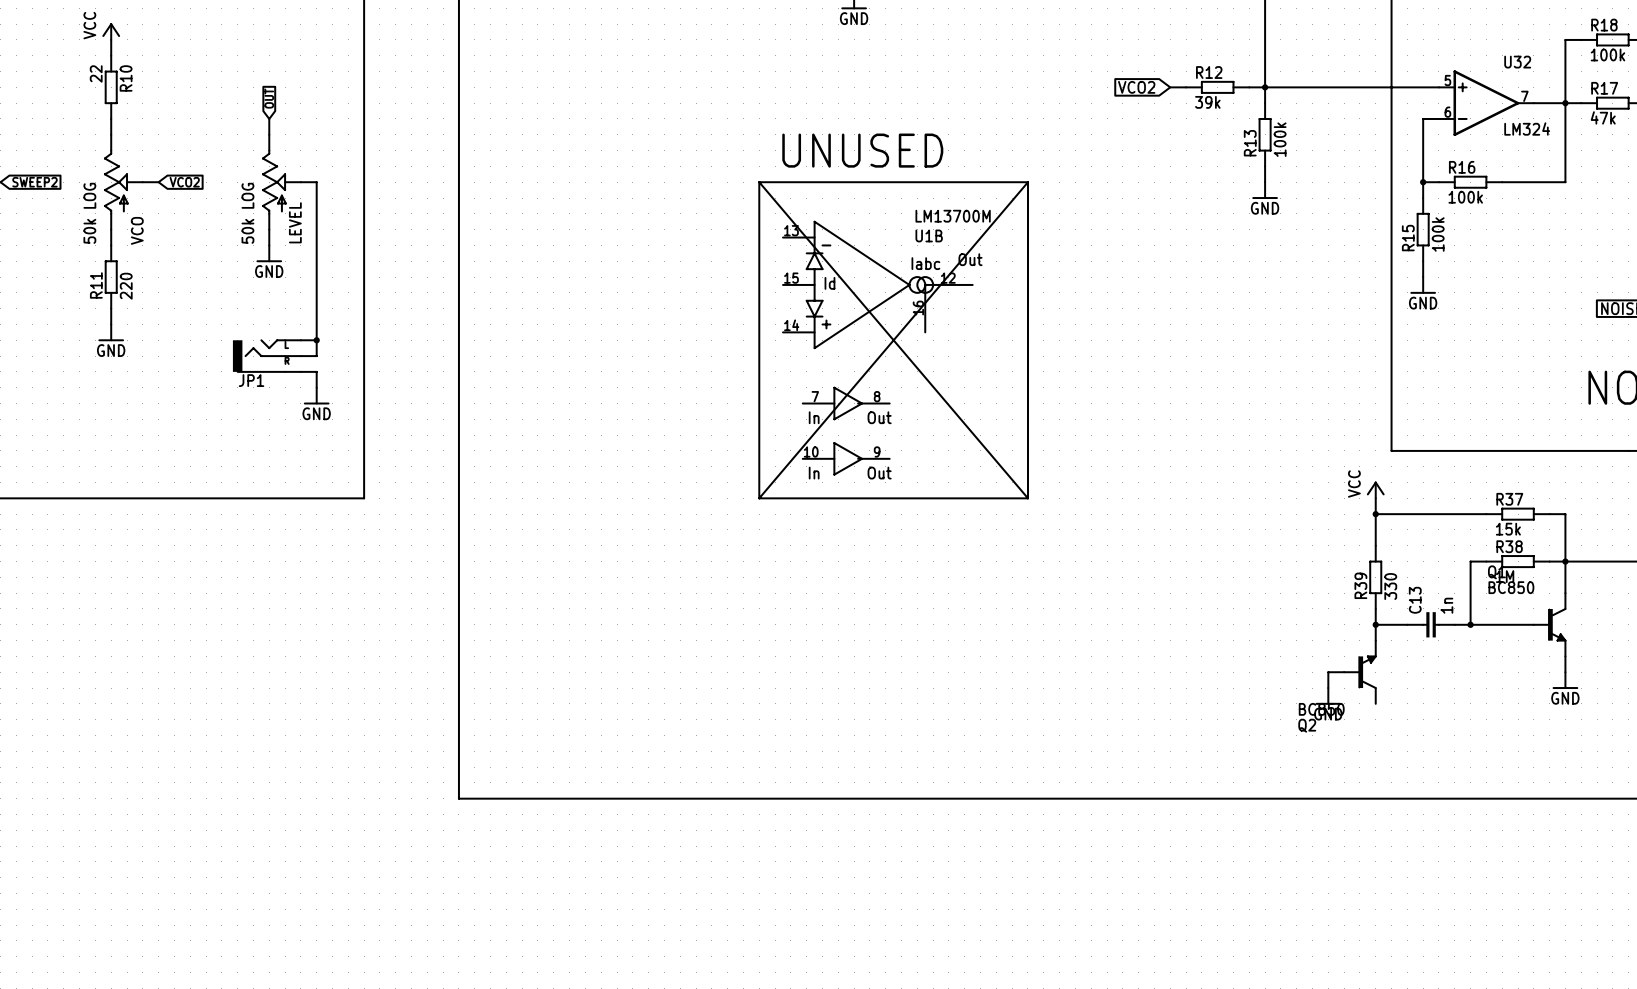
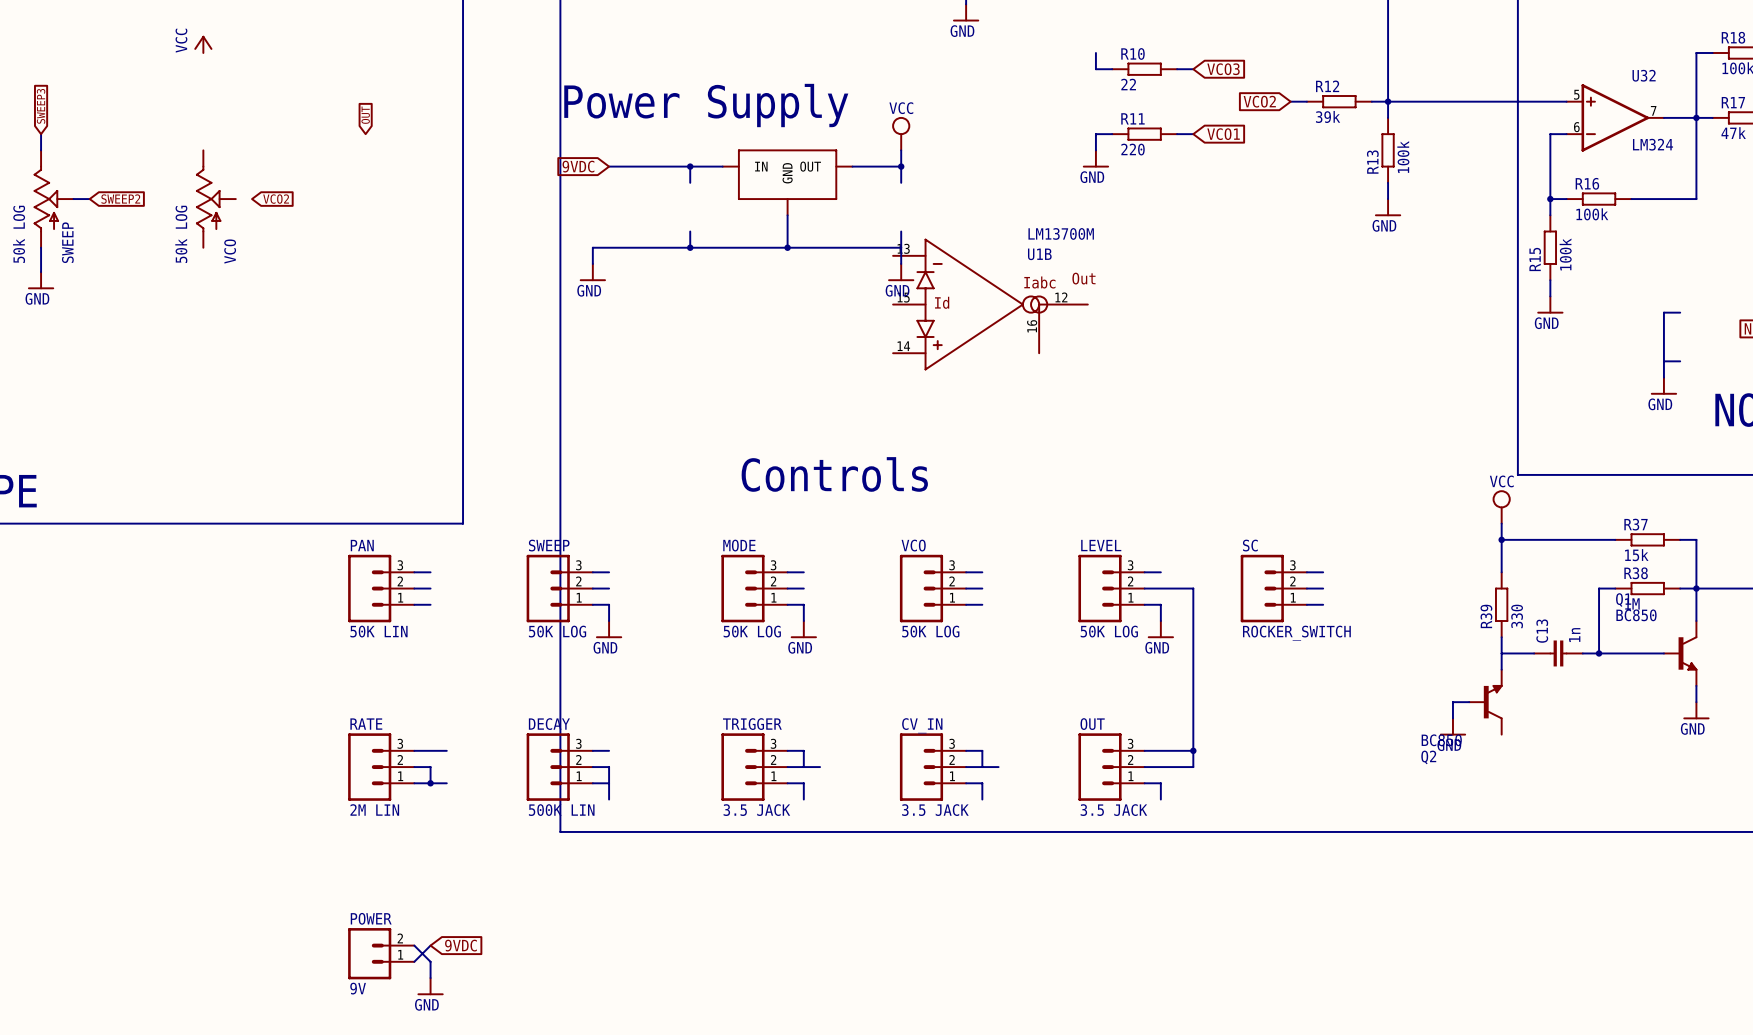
wire: (111, 39) (111, 55) -> none
wire: none -> (1095, 52) (1095, 69) (1112, 69)
wire: none -> (1177, 69) (1193, 69)
global label: none -> VCO3 (1223, 69)
R10 value position: 22 (96, 73) -> 22 (1128, 84)
R10 name position: R10 (126, 78) -> R10 (1132, 53)
R10 rotation: 0° (111, 87) -> 90° clockwise (1144, 69)
R10 position: (111, 87) -> (1144, 69)
text: none -> Power Supply (706, 105)
wire: (111, 118) (111, 134) -> none
wire: (269, 118) (269, 134) -> none
power symbol: none -> VCC (901, 133)
wire: none -> (1112, 134) (1095, 134) (1095, 150)
wire: none -> (1177, 134) (1193, 134)
global label: none -> VCO1 (1223, 134)
wire: none -> (901, 150) (901, 182)
power symbol: none -> GND (1095, 158)
global label: none -> 9VDC (578, 166)
wire: none -> (609, 166) (722, 166)
wire: none -> (690, 166) (690, 182)
junction: none -> (690, 166)
wire: none -> (852, 166) (901, 166)
junction: none -> (901, 166)
text: UNUSED (862, 150) -> none
part: none -> (787, 182)
wire: (142, 182) (158, 182) -> none
LEVEL: 50k LOG (281, 182) -> none
wire: (300, 182) (316, 182) (316, 356) (300, 356) -> none
line: (759, 182) (1027, 182) -> none
line: (759, 182) (759, 498) -> none
line: (759, 182) (1027, 498) -> none
line: (1027, 182) (1027, 498) -> none
line: (1027, 182) (759, 498) -> none
wire: none -> (787, 215) (787, 247)
wire: none -> (690, 231) (690, 247)
wire: none -> (901, 231) (901, 263)
wire: (111, 229) (111, 245) -> none
wire: (269, 229) (269, 245) -> none
junction: none -> (690, 247)
junction: none -> (787, 247)
wire: none -> (901, 247) (592, 247) (592, 263)
power symbol: GND (269, 253) -> none
power symbol: none -> GND (592, 272)
power symbol: none -> GND (901, 272)
R11 rotation: 0° (111, 277) -> 90° clockwise (1144, 134)
R11 position: (111, 277) -> (1144, 134)
wire: none -> (1680, 312) (1663, 312) (1663, 377)
wire: (111, 308) (111, 324) -> none
power symbol: GND (111, 332) -> none
wire: (300, 340) (316, 340) -> none
junction: (316, 340) -> none
wire: none -> (1663, 361) (1680, 361)
JP1: (266, 356) -> none
power symbol: none -> GND (1663, 386)
wire: (300, 371) (316, 371) (316, 387) -> none
power symbol: GND (316, 396) -> none
part: (846, 403) -> none
text: none -> Controls (834, 474)
part: (846, 458) -> none
power symbol: none -> VCC (1501, 507)
power symbol: VCC (1375, 490) -> none
line: (759, 498) (1027, 498) -> none
wire: none -> (414, 572) (430, 572)
wire: none -> (592, 572) (609, 572)
wire: none -> (787, 572) (803, 572)
wire: none -> (966, 572) (982, 572)
wire: none -> (1144, 572) (1160, 572)
wire: none -> (1306, 572) (1323, 572)
PAN: none -> 50K LIN (381, 588)
wire: none -> (414, 588) (430, 588)
SWEEP: none -> 50K LOG (559, 588)
wire: none -> (592, 588) (609, 588)
MODE: none -> 50K LOG (754, 588)
wire: none -> (787, 588) (803, 588)
VCO: none -> 50K LOG (933, 588)
wire: none -> (966, 588) (982, 588)
LEVEL: none -> 50K LOG (1111, 588)
wire: none -> (1144, 588) (1193, 588) (1193, 767) (1144, 767)
SC: none -> ROCKER_SWITCH (1273, 588)
wire: none -> (1306, 588) (1323, 588)
wire: none -> (414, 604) (430, 604)
wire: none -> (592, 604) (609, 604) (609, 621)
wire: none -> (787, 604) (803, 604) (803, 621)
wire: none -> (966, 604) (982, 604)
wire: none -> (1144, 604) (1160, 604) (1160, 621)
wire: none -> (1306, 604) (1323, 604)
power symbol: none -> GND (609, 629)
power symbol: none -> GND (803, 629)
power symbol: none -> GND (1160, 629)
junction: (1375, 624) -> none
wire: none -> (414, 750) (446, 750)
wire: none -> (592, 750) (609, 750)
wire: none -> (787, 750) (803, 750) (803, 767)
wire: none -> (966, 750) (982, 750) (982, 767)
wire: none -> (1144, 750) (1193, 750)
junction: none -> (1193, 750)
RATE: none -> 2M LIN (381, 767)
wire: none -> (414, 767) (430, 767) (430, 783)
DECAY: none -> 500K LIN (559, 767)
wire: none -> (592, 767) (609, 767) (609, 799)
TRIGGER: none -> 3.5 JACK (754, 767)
wire: none -> (787, 767) (820, 767)
CV_IN: none -> 3.5 JACK (933, 767)
wire: none -> (966, 767) (998, 767)
OUT: none -> 3.5 JACK (1111, 767)
wire: none -> (414, 783) (446, 783)
junction: none -> (430, 783)
wire: none -> (592, 783) (609, 783)
wire: none -> (787, 783) (803, 783) (803, 799)
wire: none -> (966, 783) (982, 783) (982, 799)
wire: none -> (1144, 783) (1160, 783) (1160, 799)
wire: none -> (414, 945) (430, 961) (430, 978)
wire: none -> (430, 945) (414, 961)
global label: none -> 9VDC (460, 945)
POWER: none -> 9V (381, 953)
power symbol: none -> GND (430, 986)

